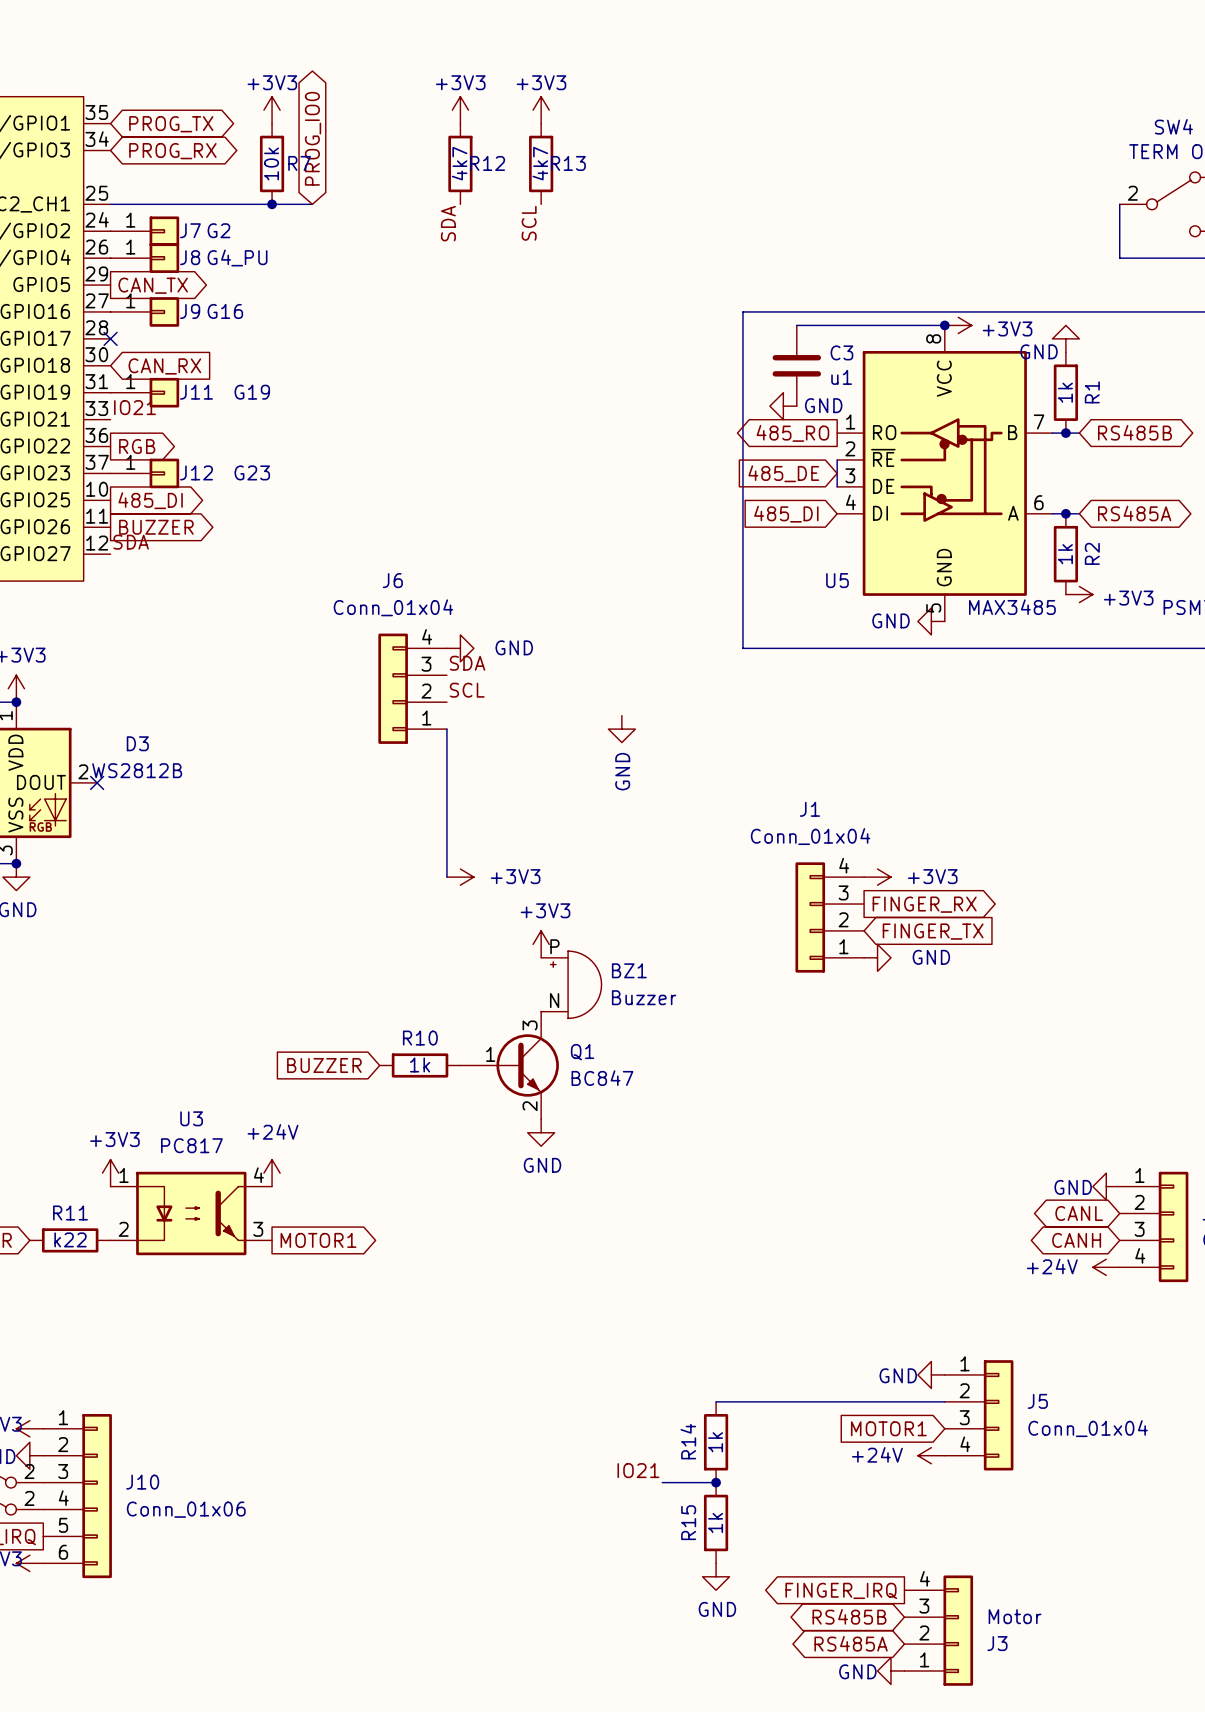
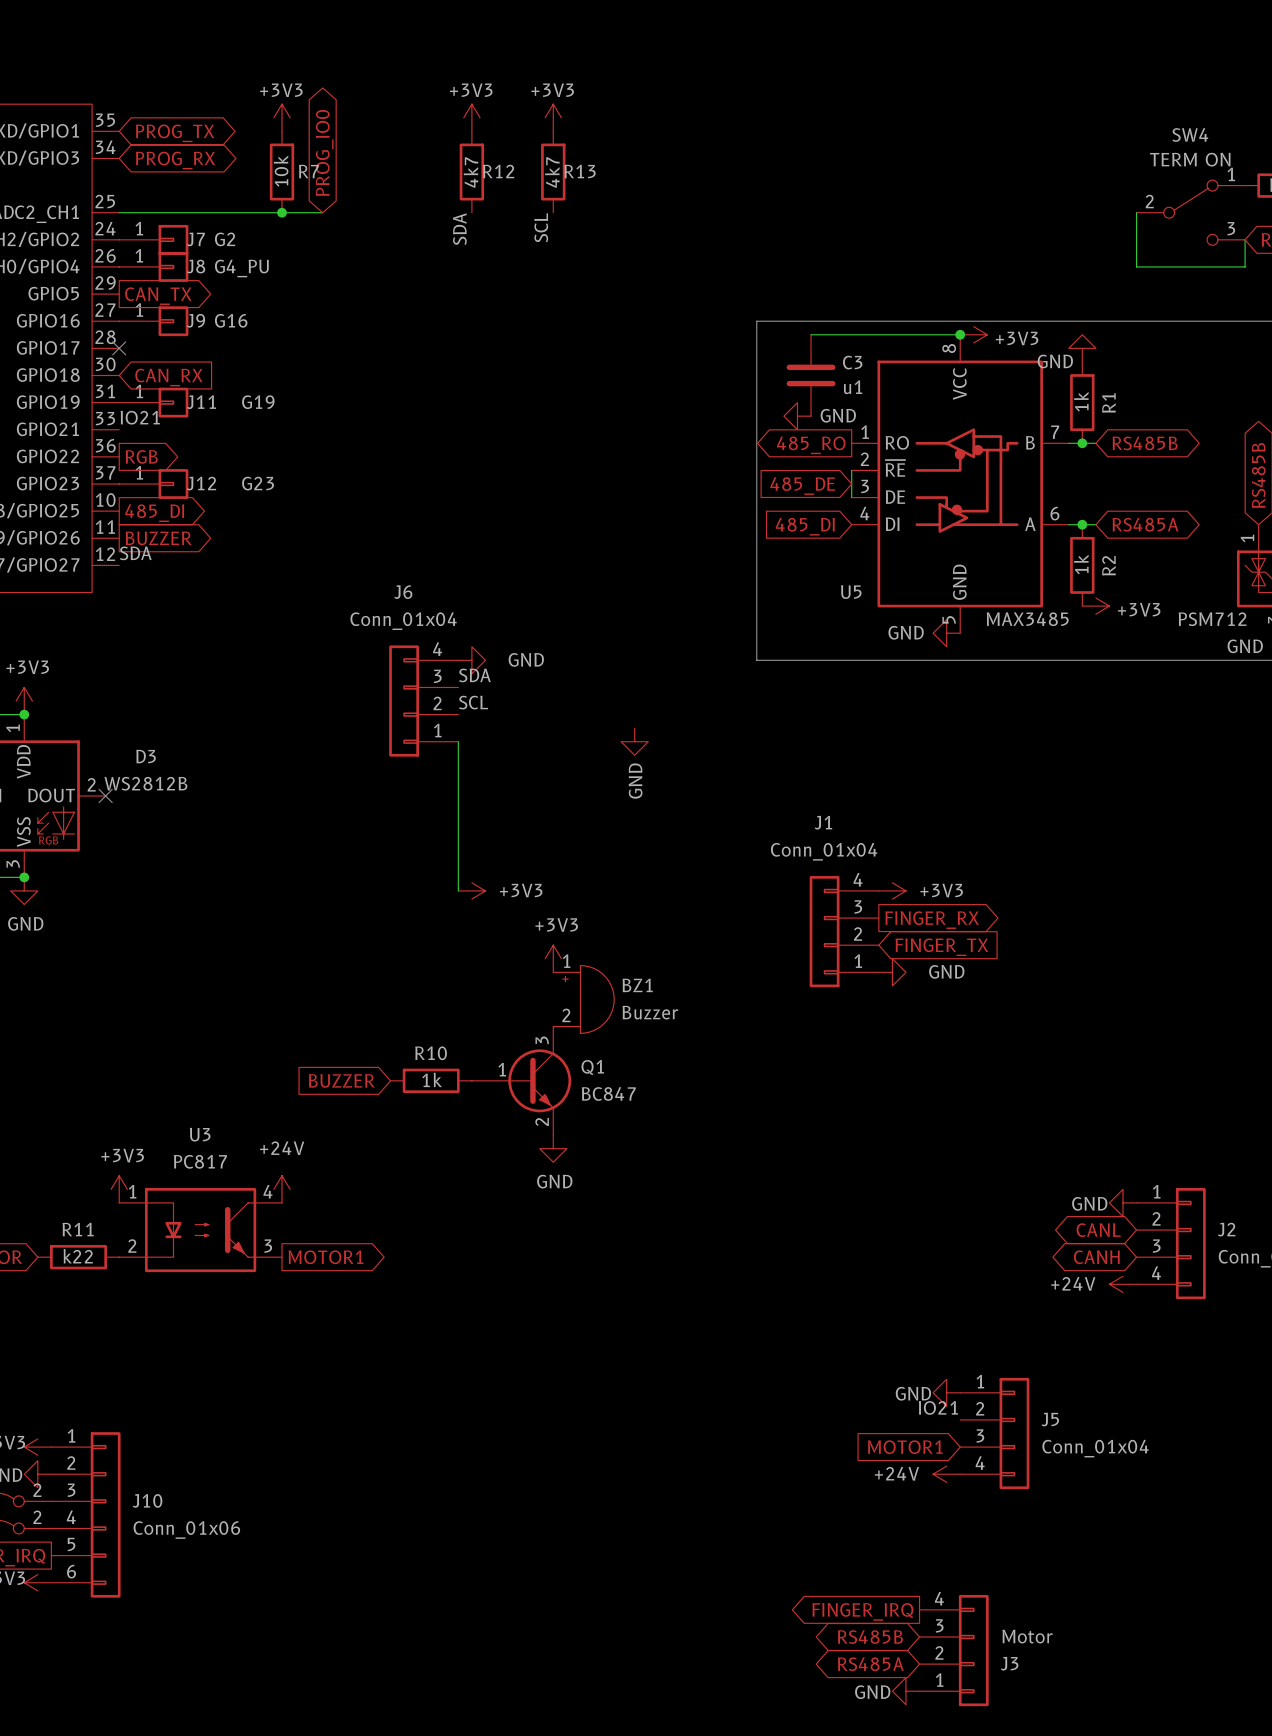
BZ1 pin number: P (554, 946) -> 1 (566, 961)
BZ1 pin number: N (554, 1000) -> 2 (566, 1015)
label: none -> IO21 (938, 1407)
wire: (716, 1401) (944, 1401) -> none
R14: 1k (716, 1442) -> none
label: IO21 (638, 1470) -> none
wire: (662, 1482) (716, 1482) -> none
junction: (716, 1482) -> none
R15: 1k (716, 1522) -> none
power symbol: GND (716, 1576) -> none

